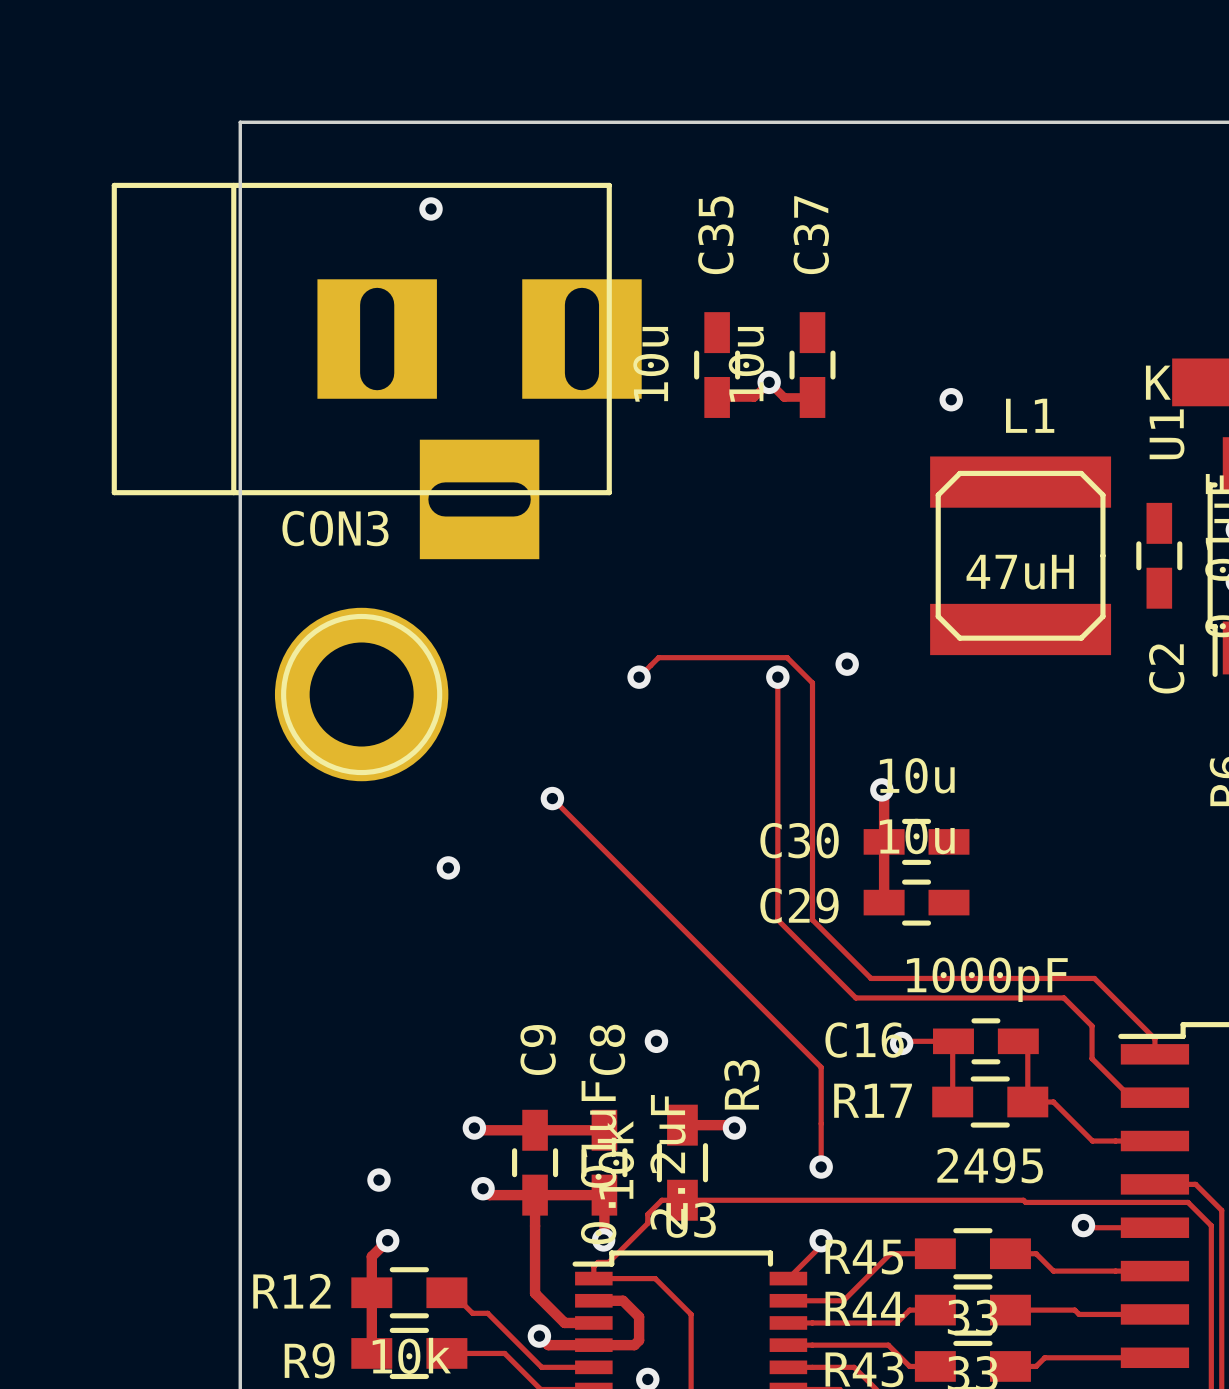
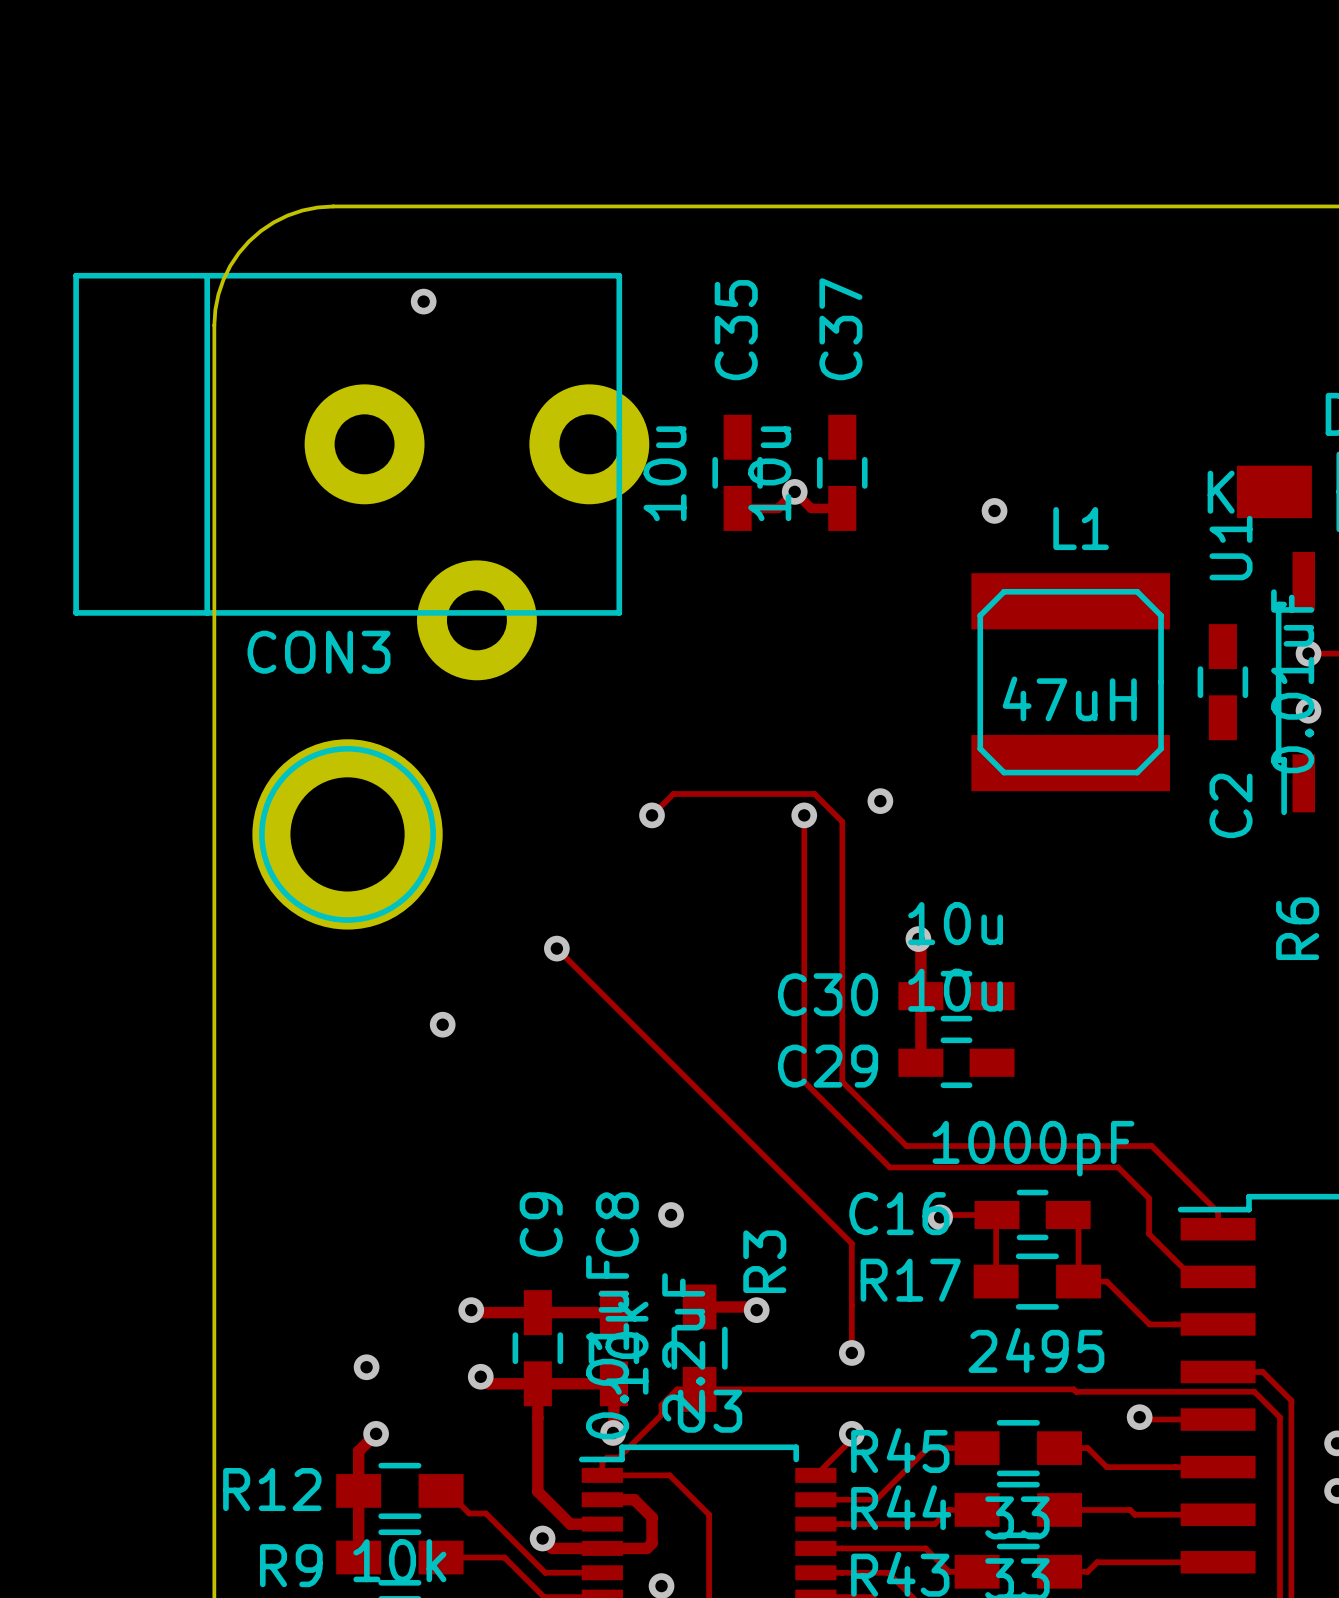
board edge: (348, 122) (240, 122) (240, 230) -> (333, 206) (302, 210) (287, 215) (260, 231) (249, 241) (238, 252) (223, 279) (218, 294) (214, 325)
CON3 footprint: [111, 182, 642, 560] -> [73, 272, 650, 681]

